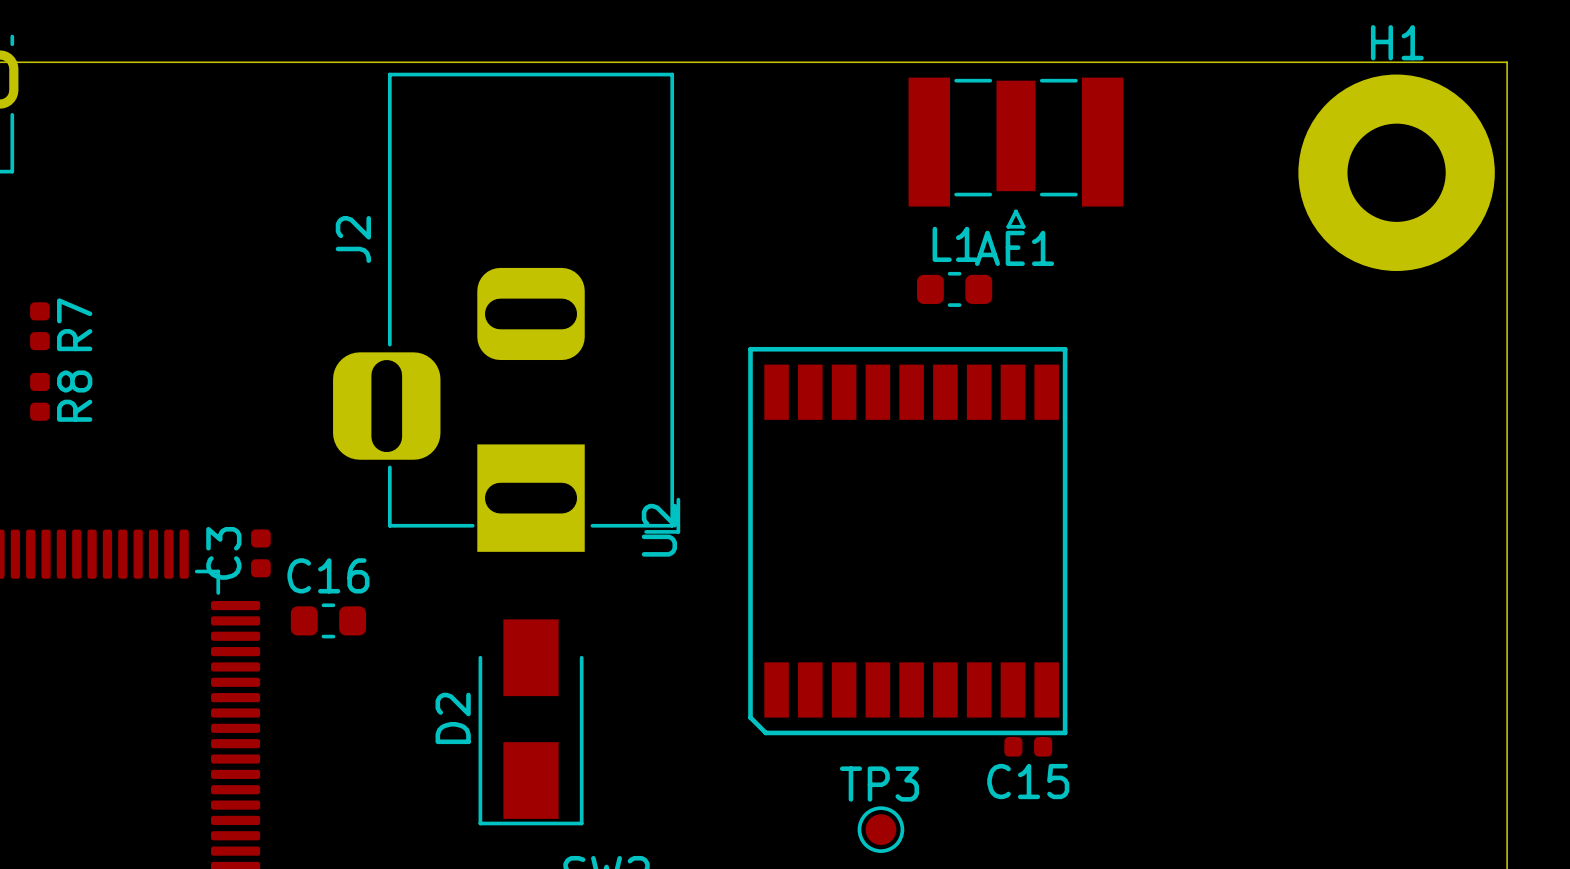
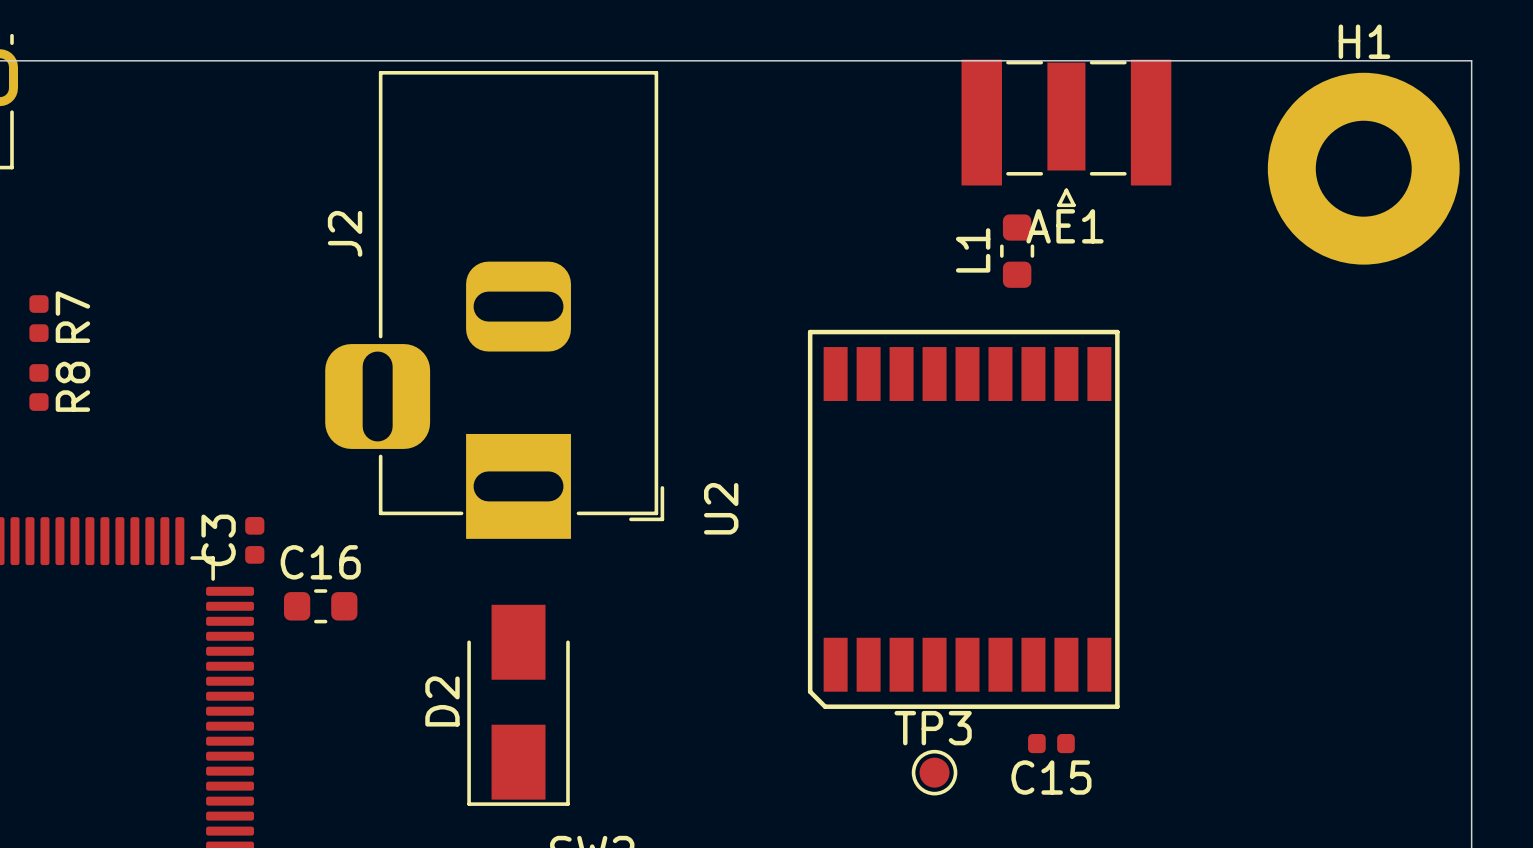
AE1 position: (1015, 153) -> (1066, 133)
L1 name position: L1 (955, 244) -> L1 (973, 250)
L1 rotation: 0° (954, 289) -> 90° clockwise (1017, 251)
L1 position: (954, 289) -> (1017, 251)
U2 position: (907, 541) -> (963, 519)
C15 position: (1028, 746) -> (1051, 743)
TP3 position: (880, 829) -> (934, 772)

